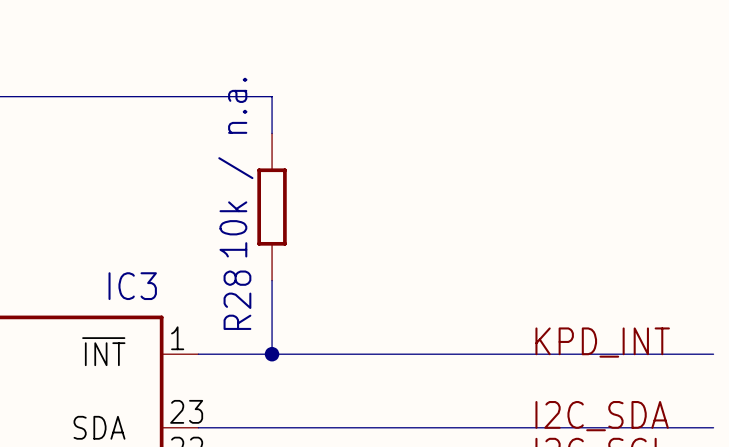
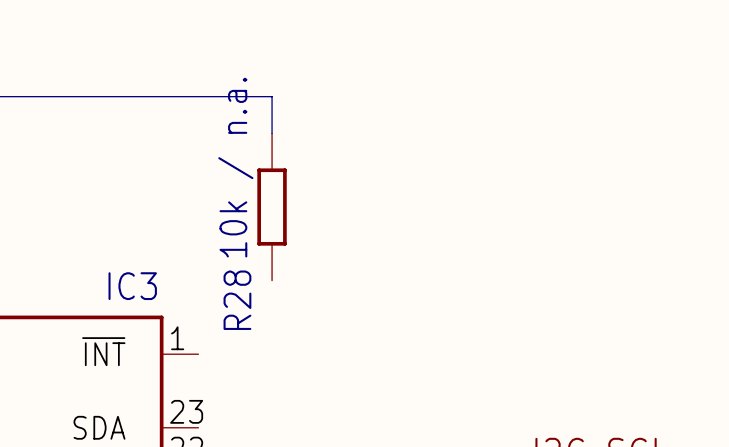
wire: (272, 280) (272, 354) -> none
label: KPD_INT (602, 342) -> none
wire: (198, 354) (713, 354) -> none
junction: (272, 354) -> none
label: I2C_SDA (602, 416) -> none
wire: (198, 427) (713, 427) -> none

